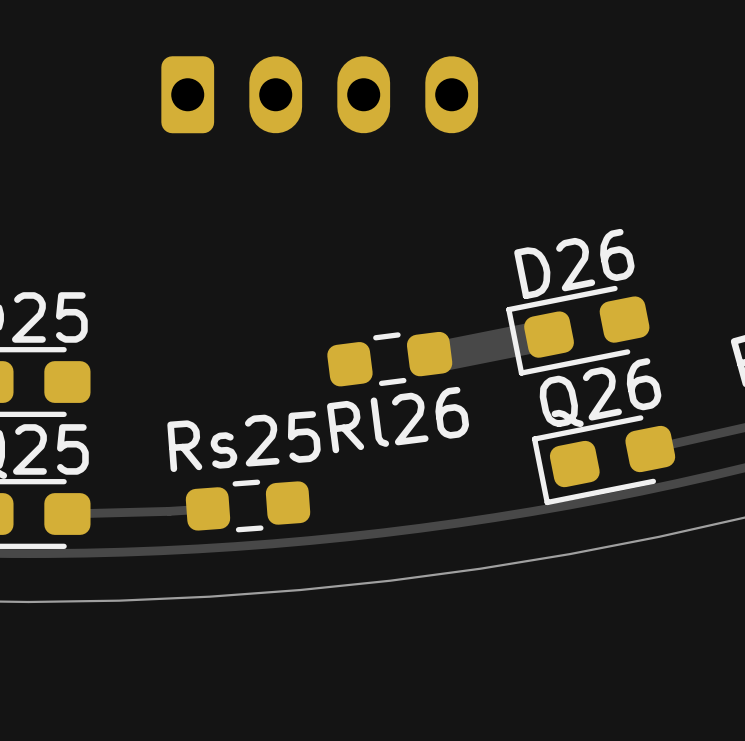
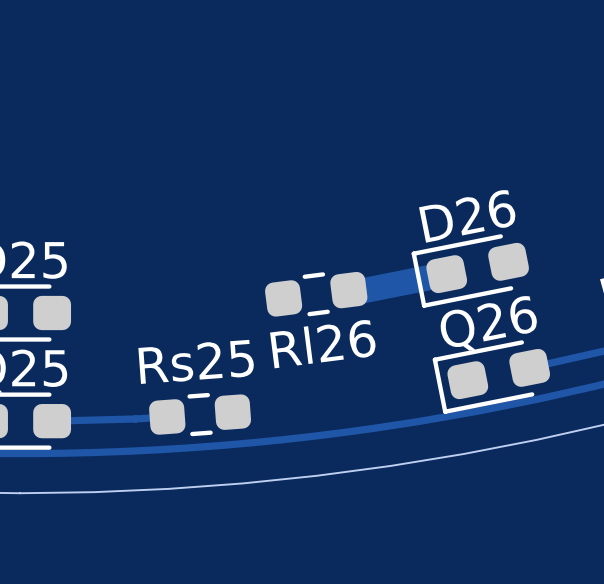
part: (319, 94) -> none

